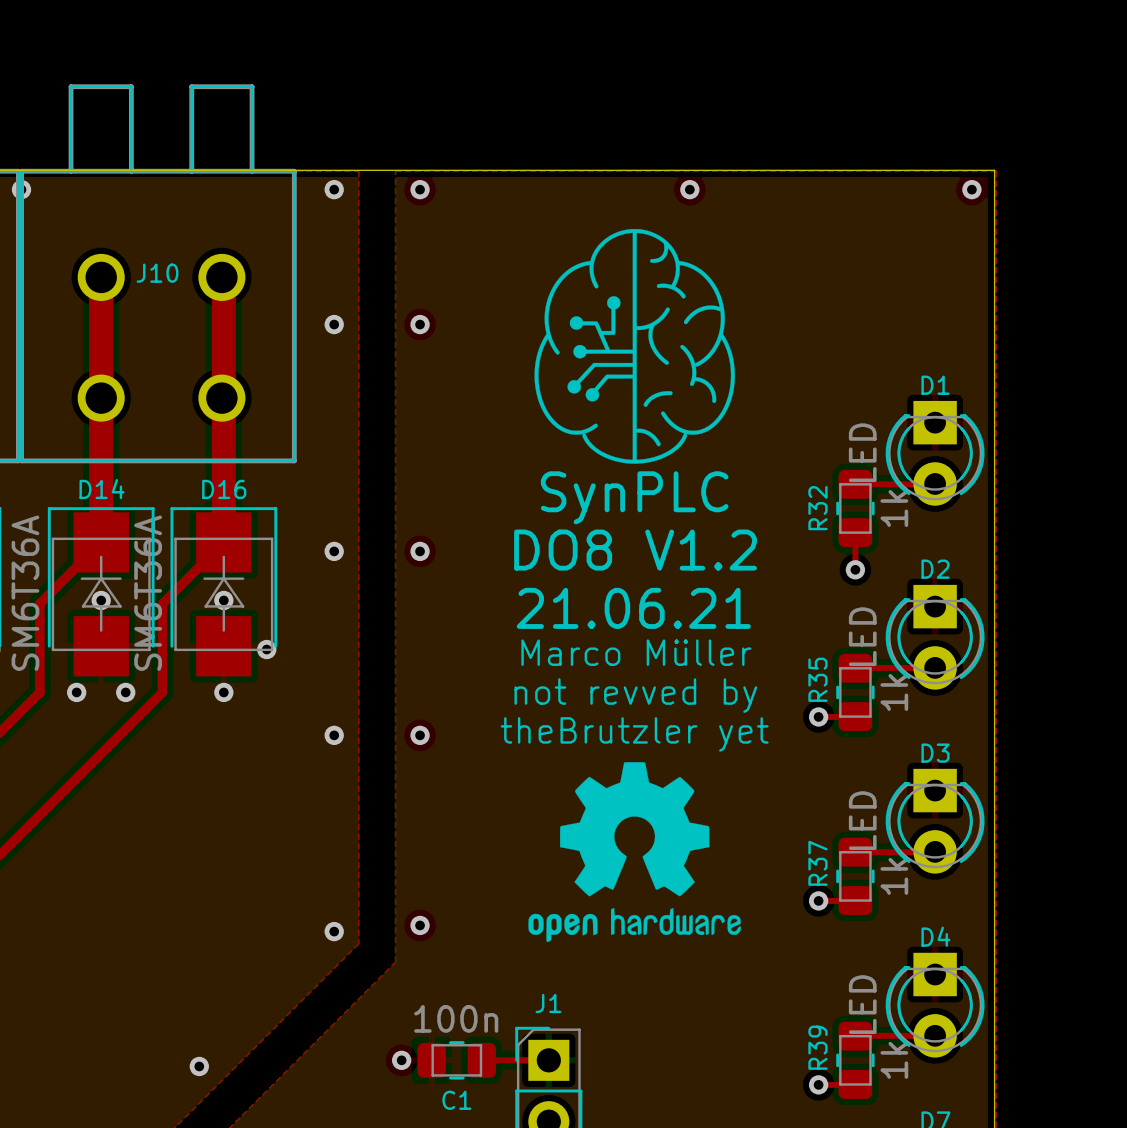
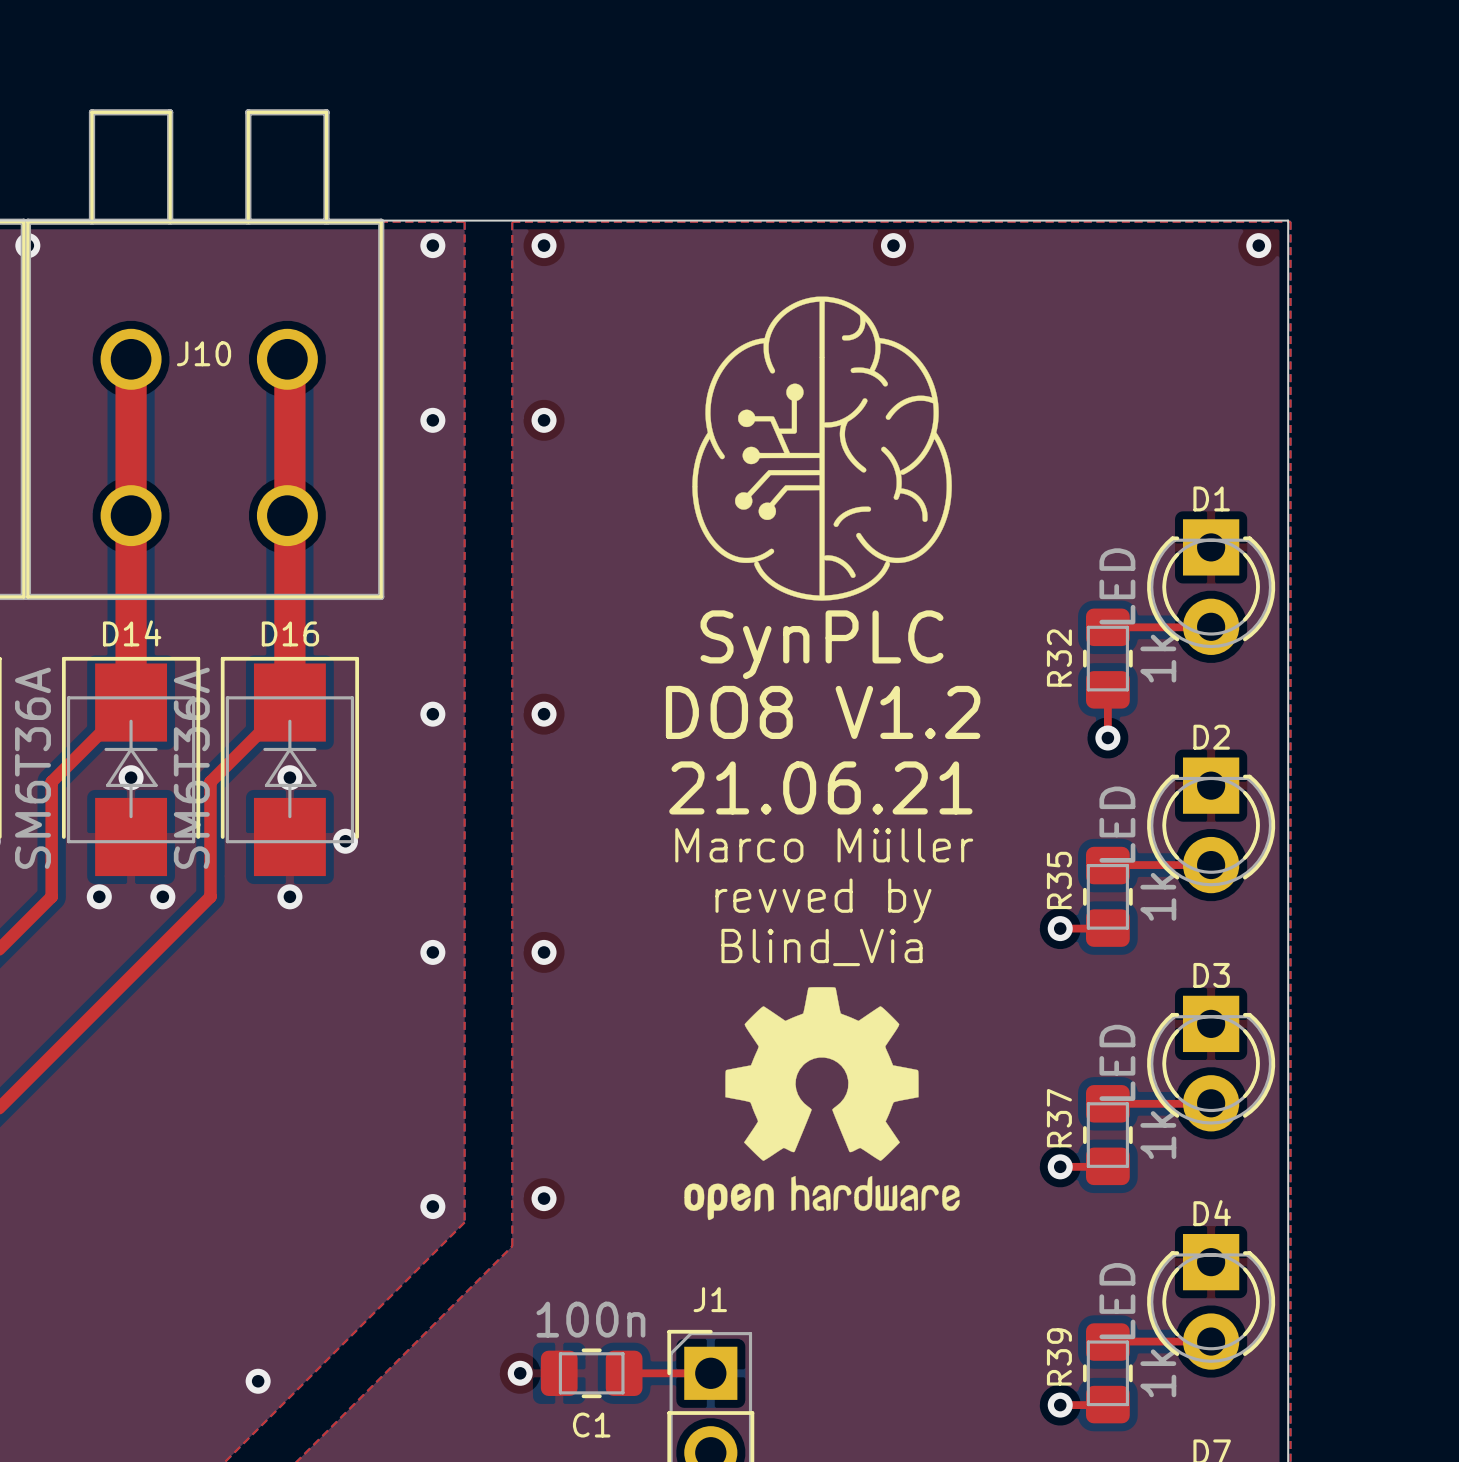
text: not revved by (635, 695) -> revved by (823, 900)
text: theBrutzler yet (634, 734) -> Blind_Via (821, 947)

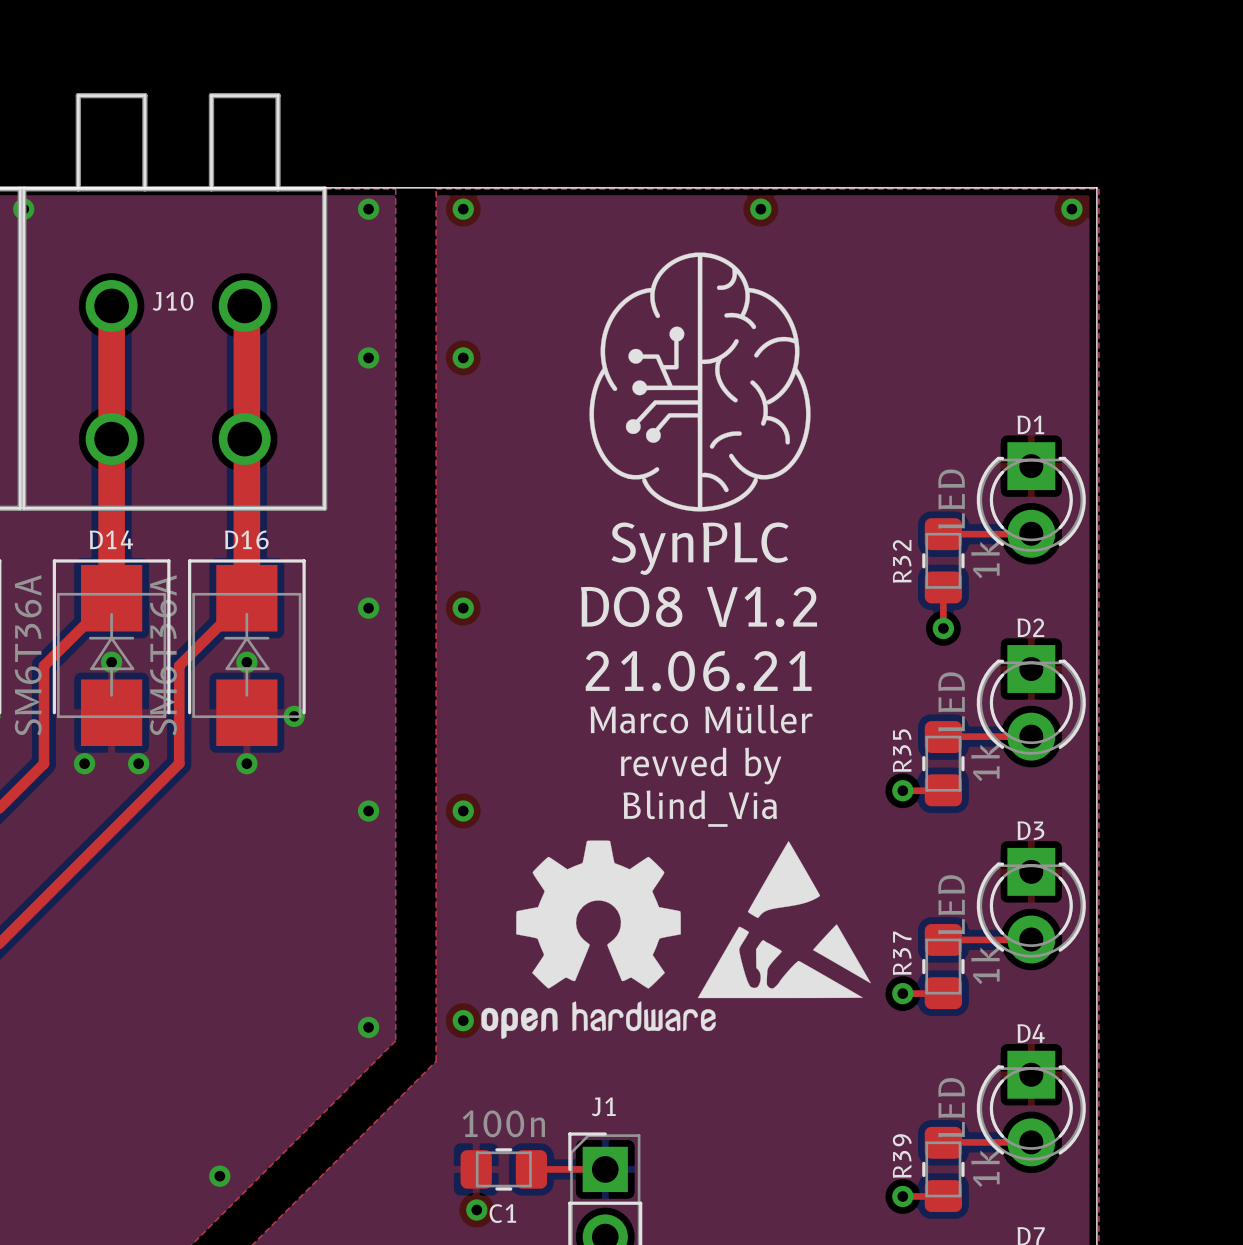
drawing: none -> [697, 841, 871, 999]
drawing position: (821, 1103) -> (598, 939)
via position: (520, 1373) -> (476, 1210)

